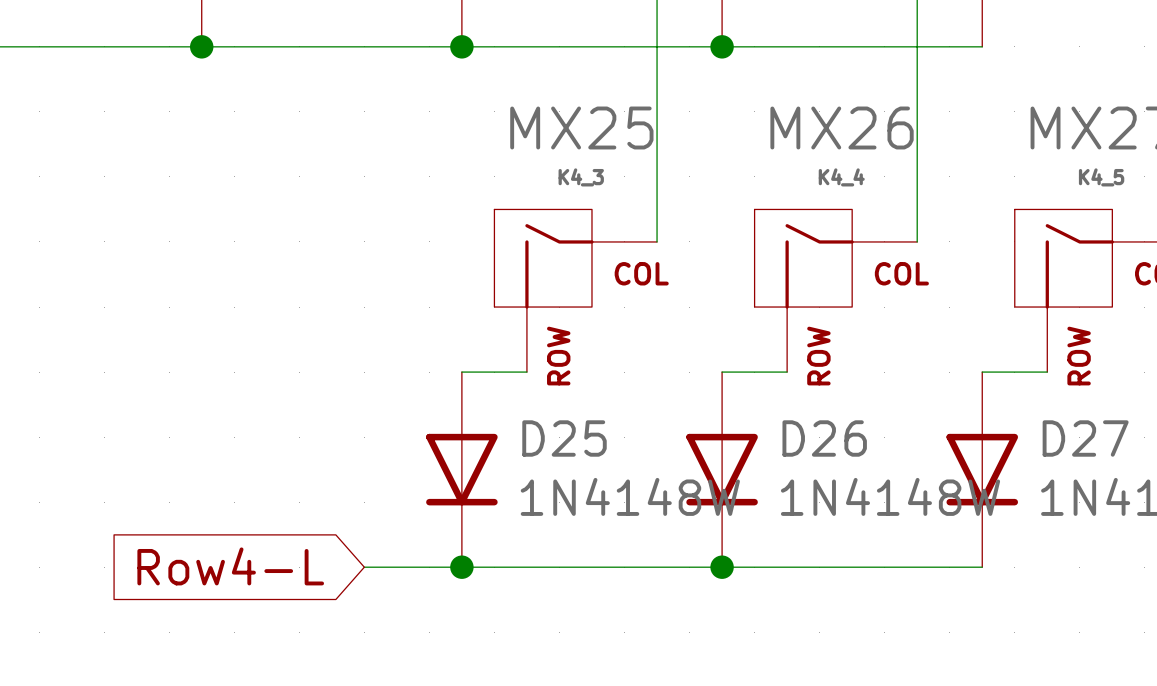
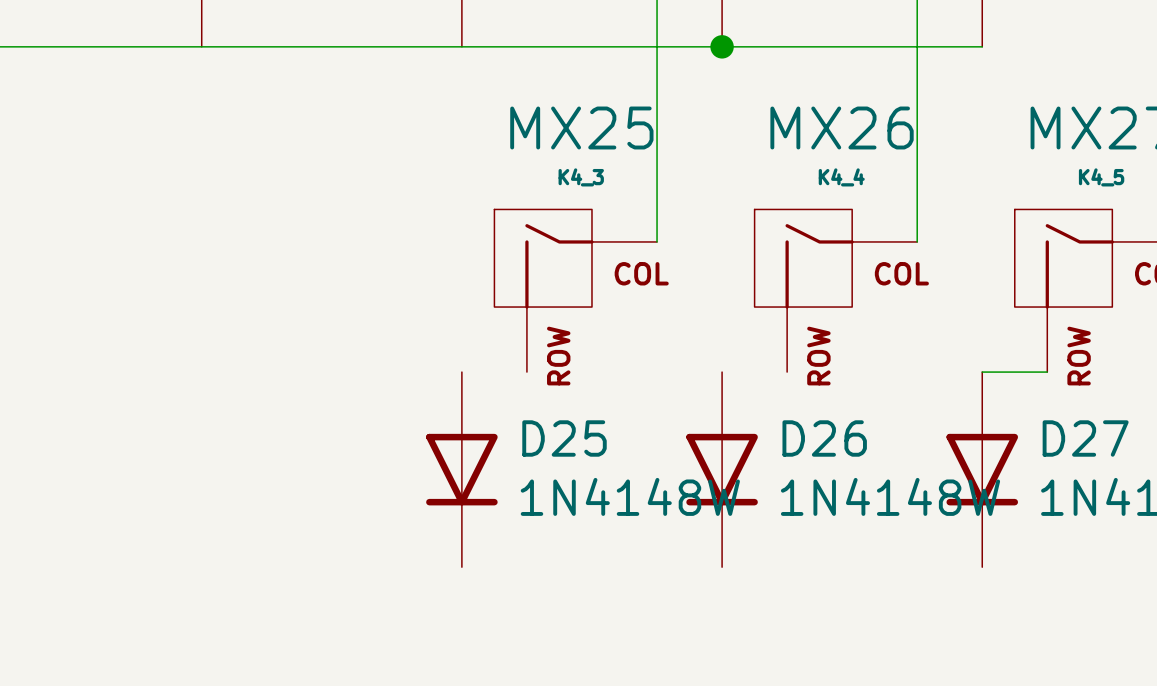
junction: (201, 46) -> none
junction: (461, 46) -> none
wire: (461, 372) (526, 372) -> none
wire: (722, 372) (787, 372) -> none
global label: Row4-L (230, 566) -> none
wire: (364, 567) (982, 567) -> none
junction: (461, 567) -> none
junction: (722, 567) -> none

